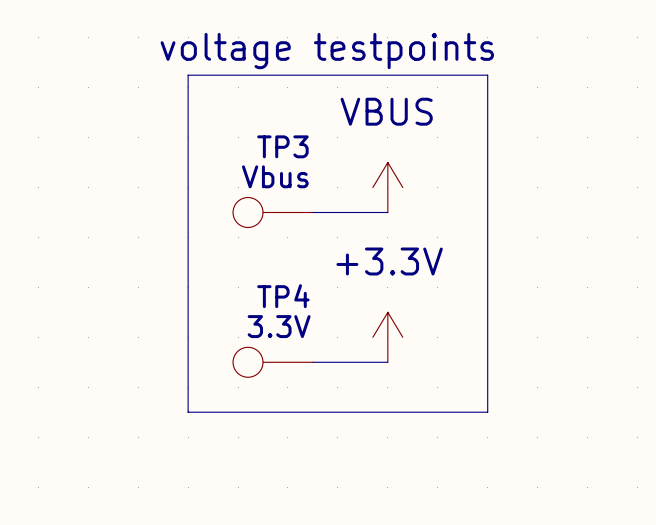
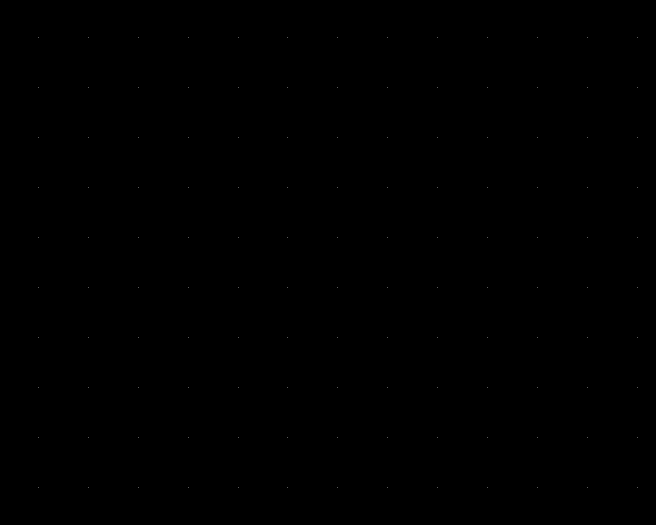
text: voltage testpoints (327, 51) -> none
line: (188, 75) (487, 75) (487, 412) (188, 412) (188, 75) -> none
power symbol: VBUS (387, 187) -> none
TP3: Vbus (273, 212) -> none
wire: (312, 212) (387, 212) -> none
power symbol: +3.3V (387, 337) -> none
TP4: 3.3V (273, 362) -> none
wire: (312, 362) (387, 362) -> none

